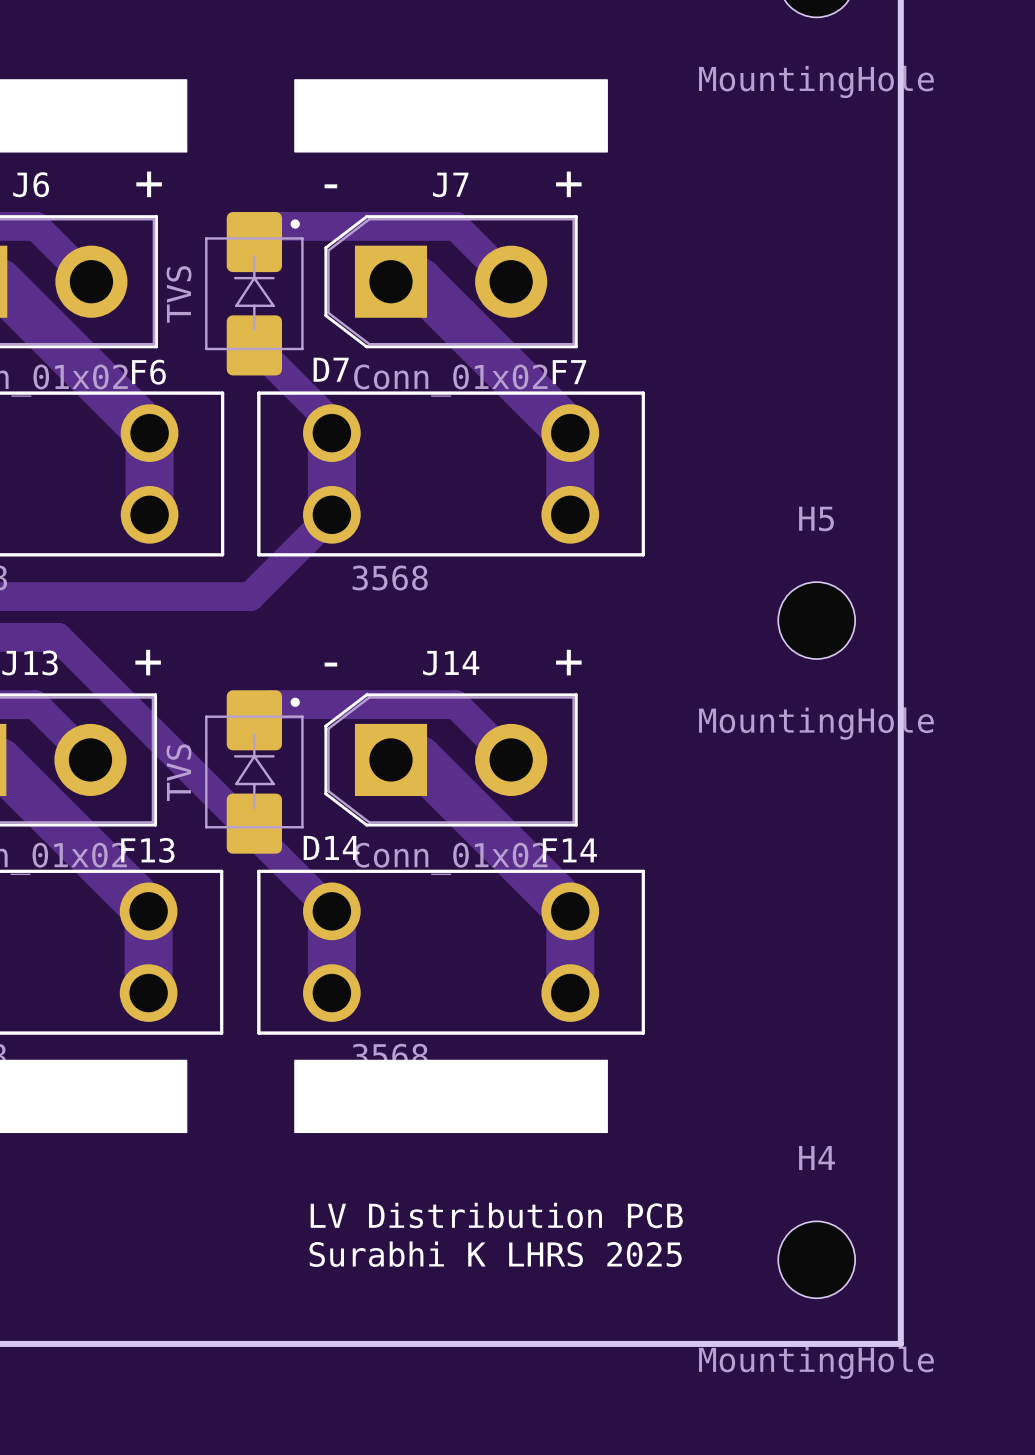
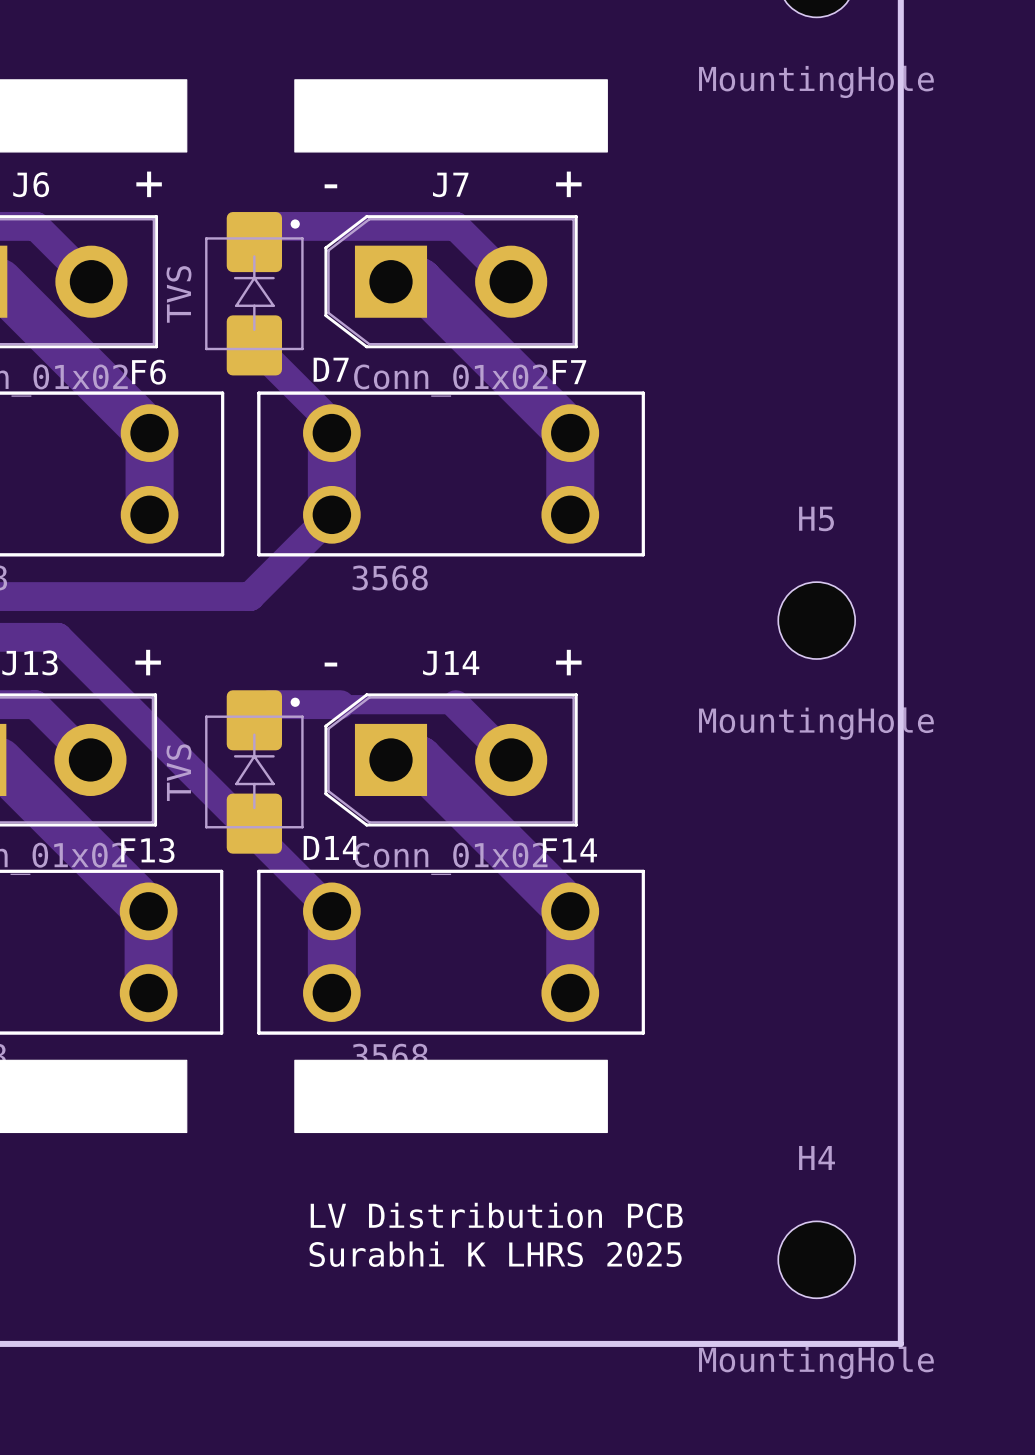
track width: thick (340, 704) (455, 704) -> thin (340, 704) (455, 704)

